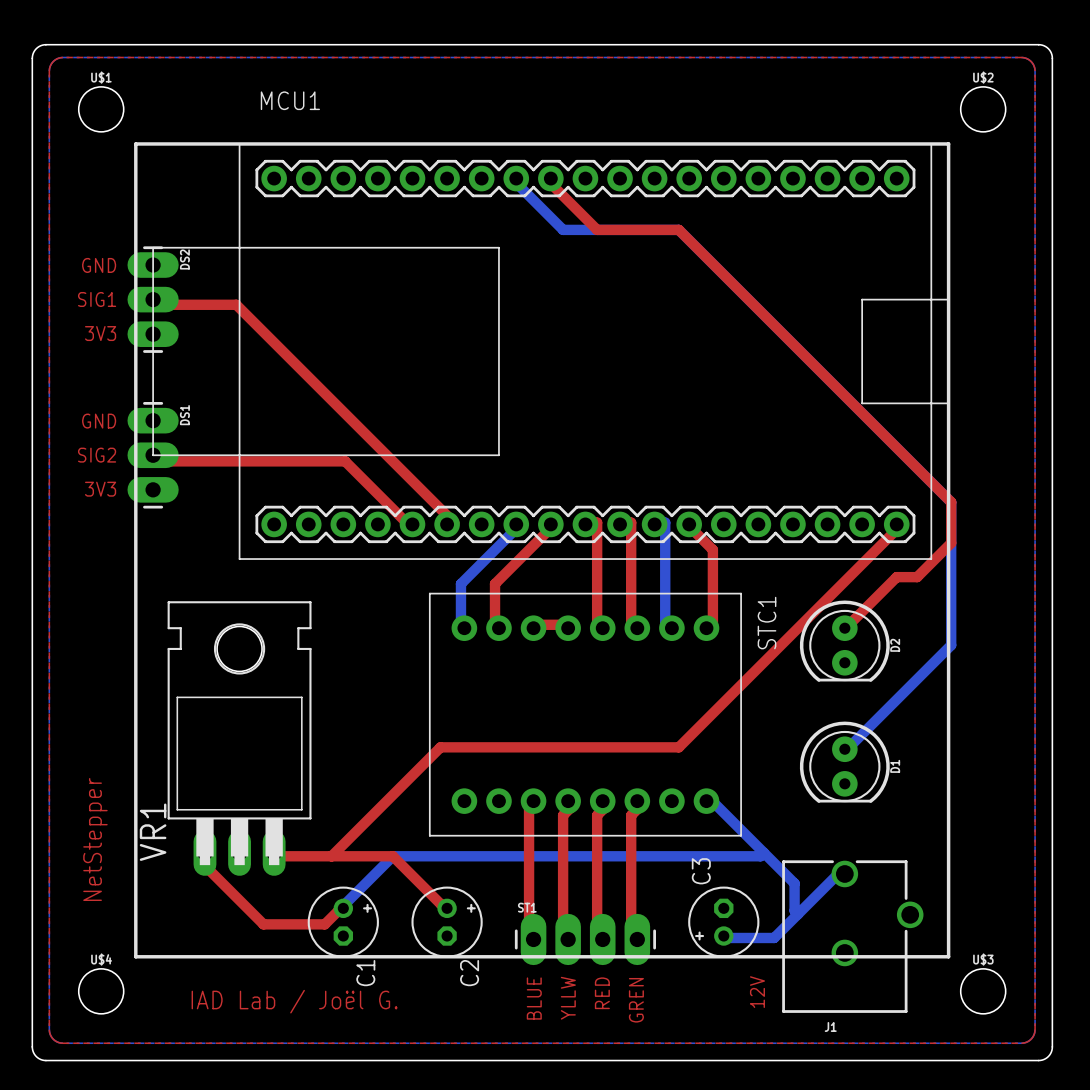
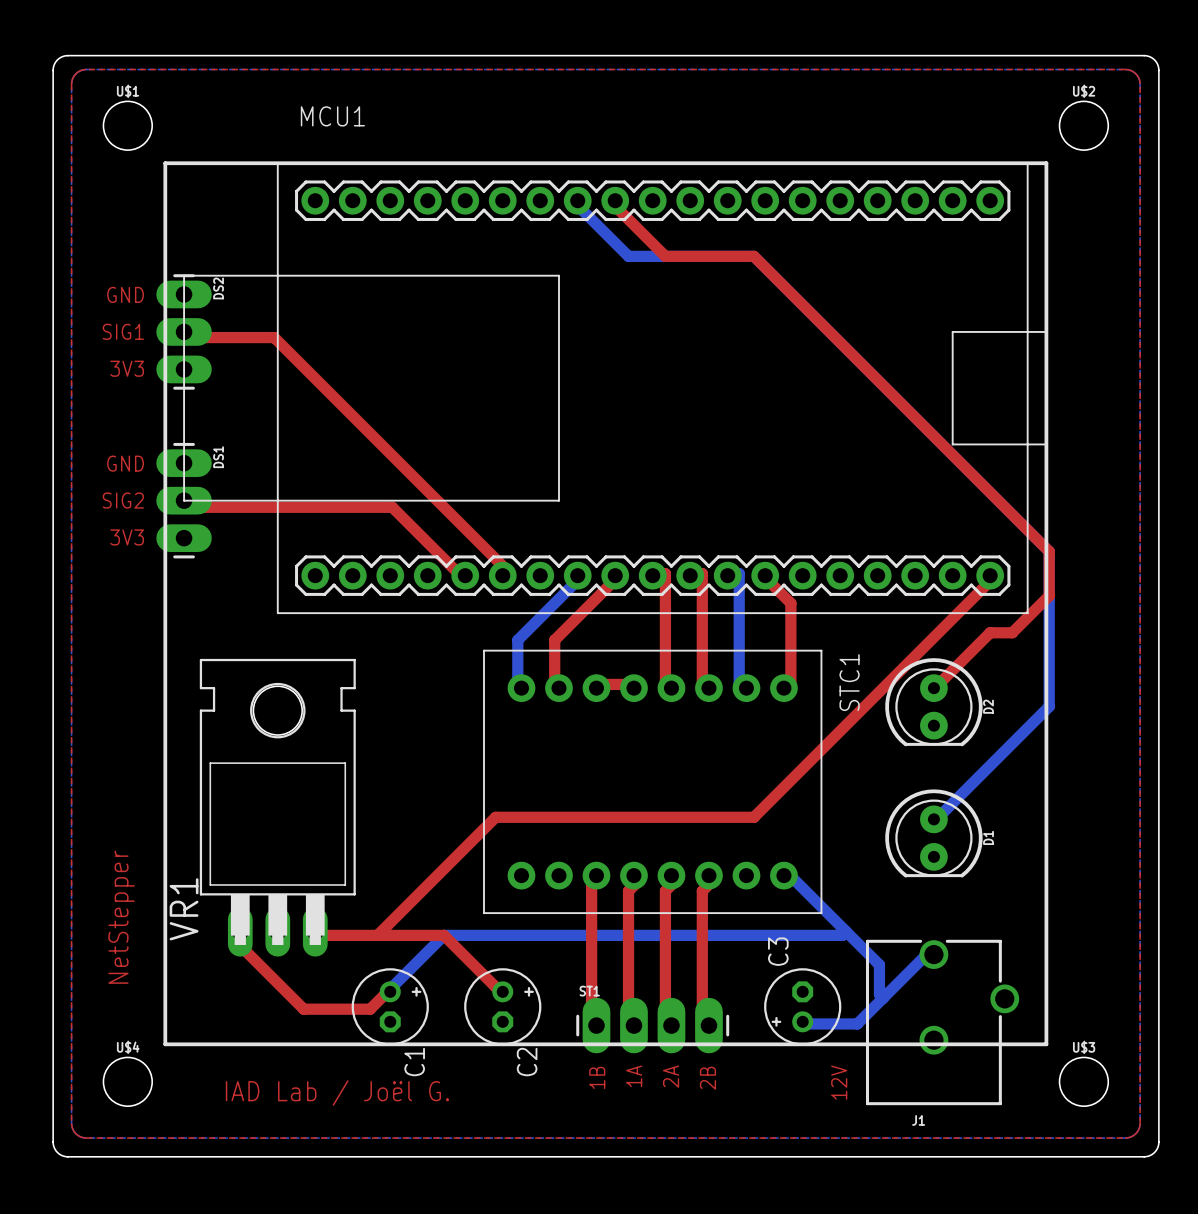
text: RED (602, 993) -> 2A (671, 1076)
text: BLUE (534, 998) -> 1B (597, 1077)
text: YLLW (568, 998) -> 1A (634, 1076)
text: GREN (636, 1000) -> 2B (707, 1078)

